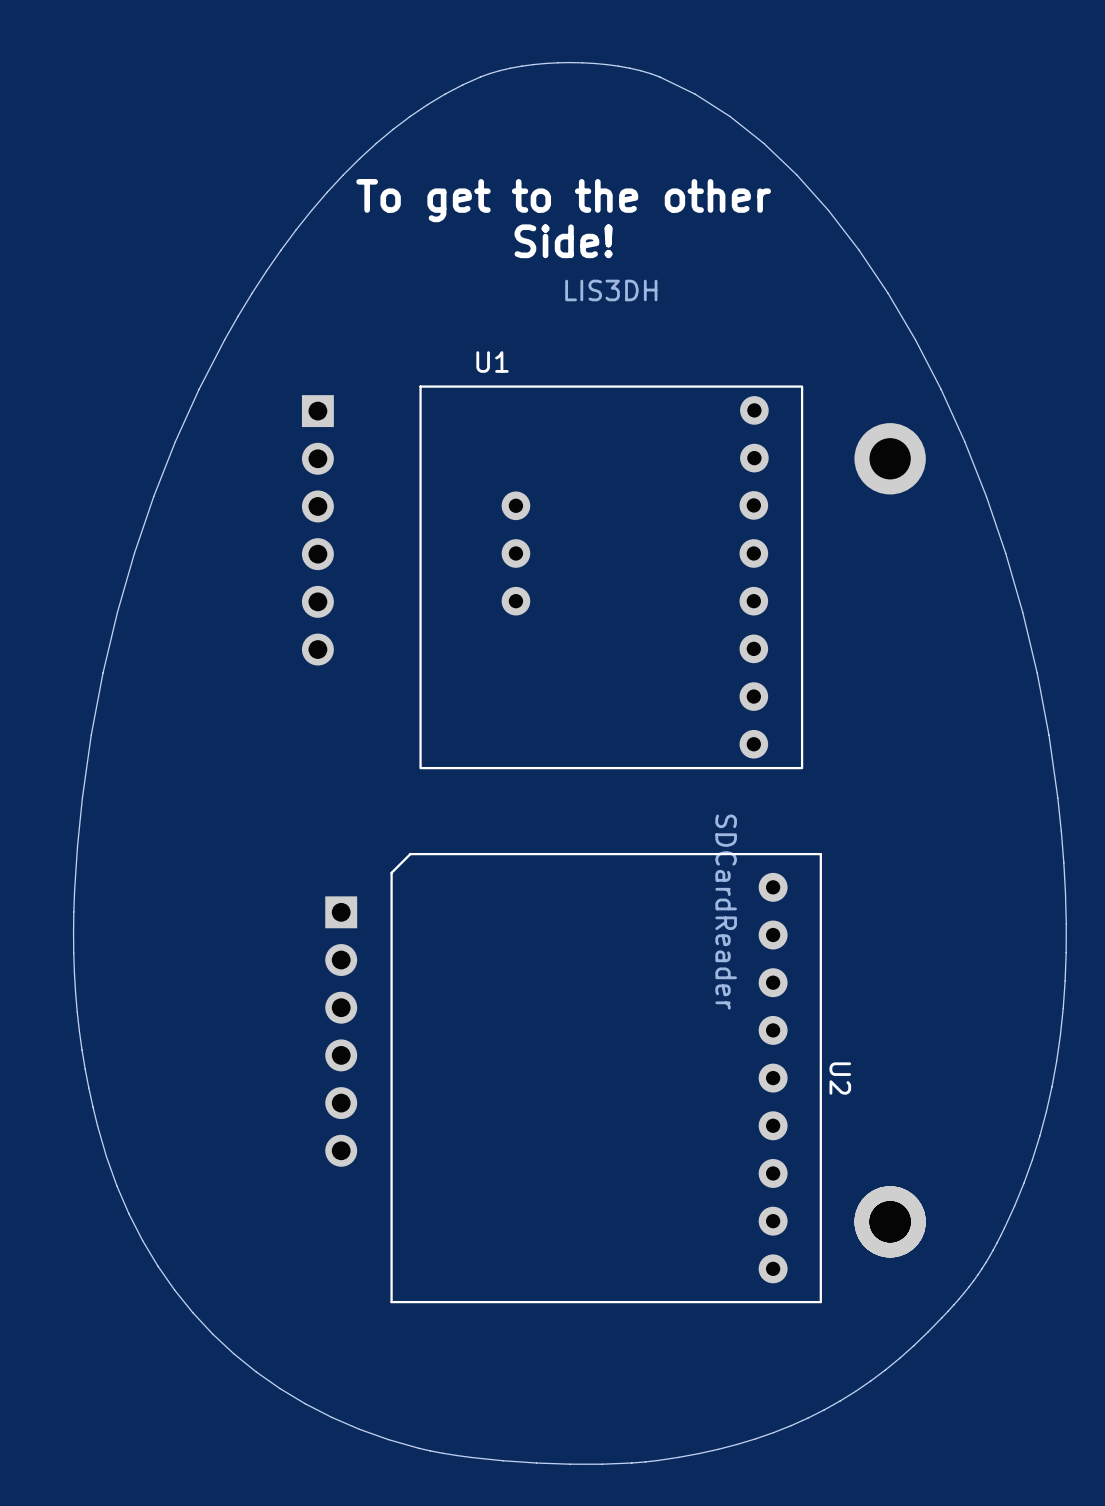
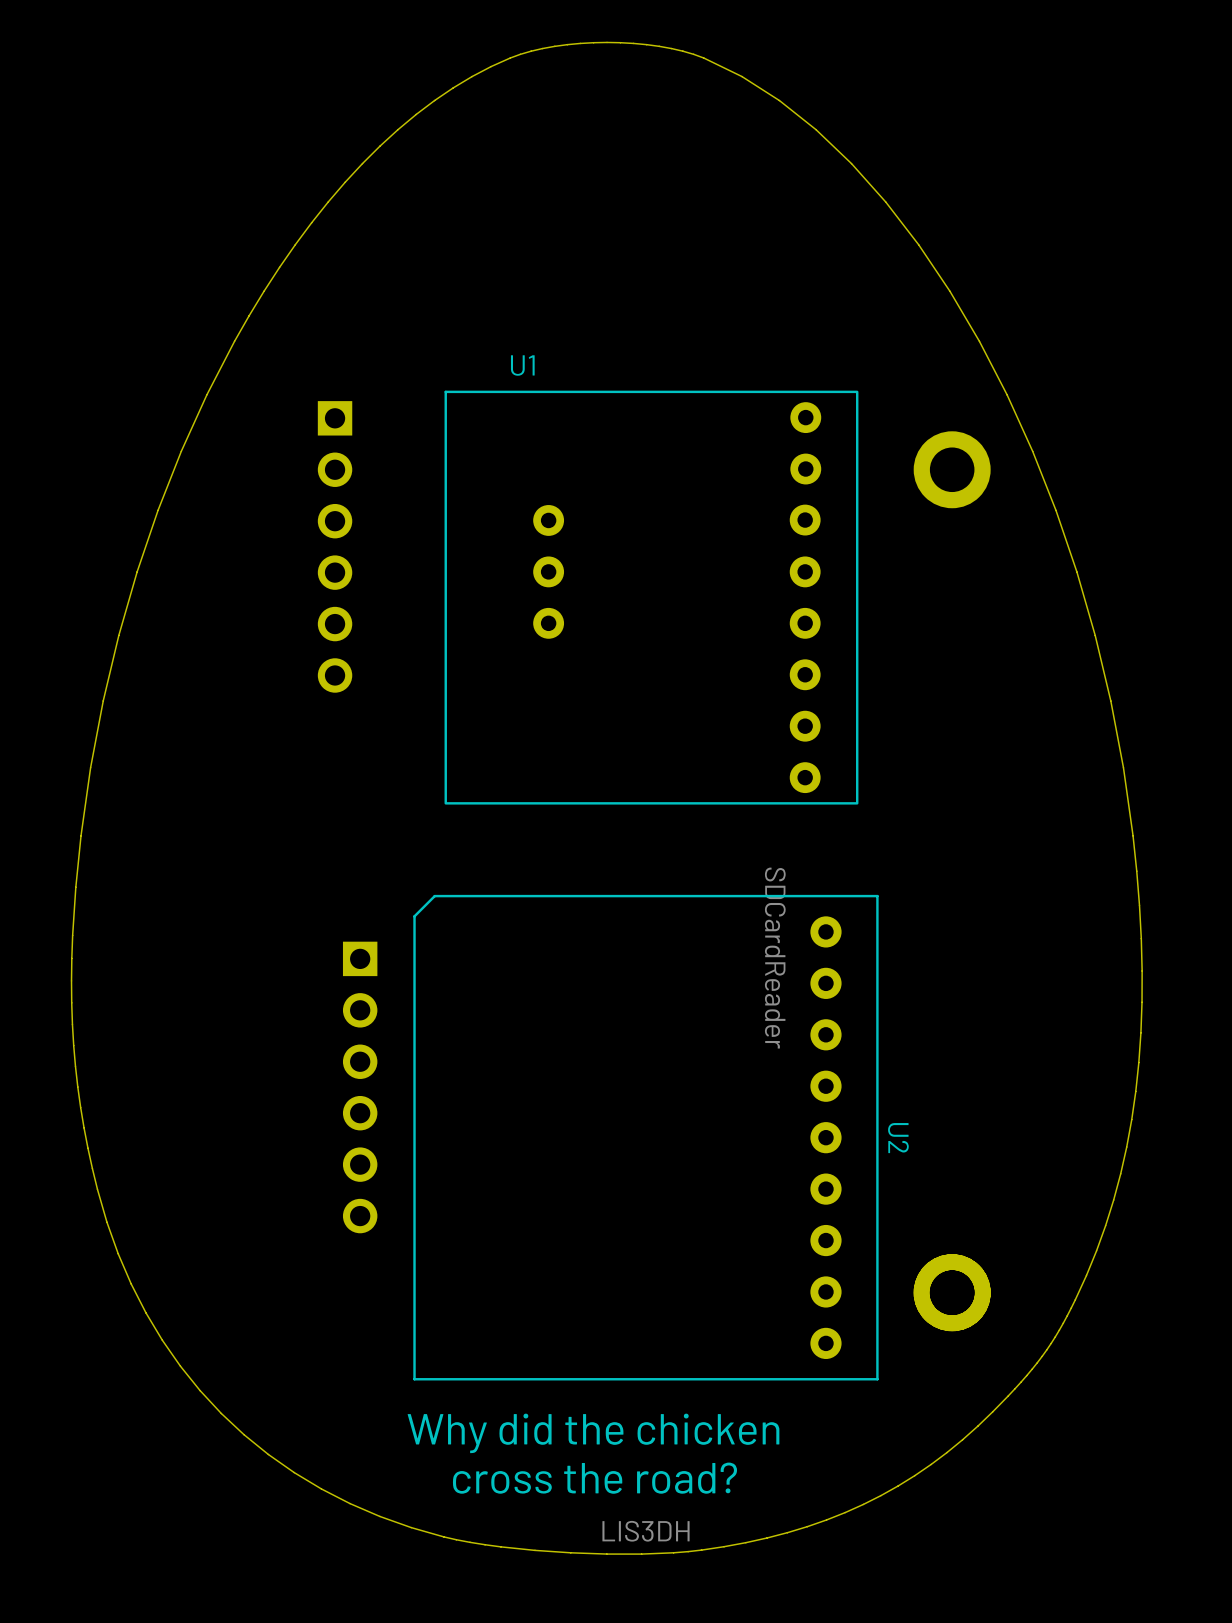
text: To get to the other (563, 200) -> none
text: Side! (563, 241) -> none
U1 value position: LIS3DH (611, 290) -> LIS3DH (646, 1531)
text: none -> Why did the chicken (593, 1433)
text: none -> cross the road? (594, 1478)

